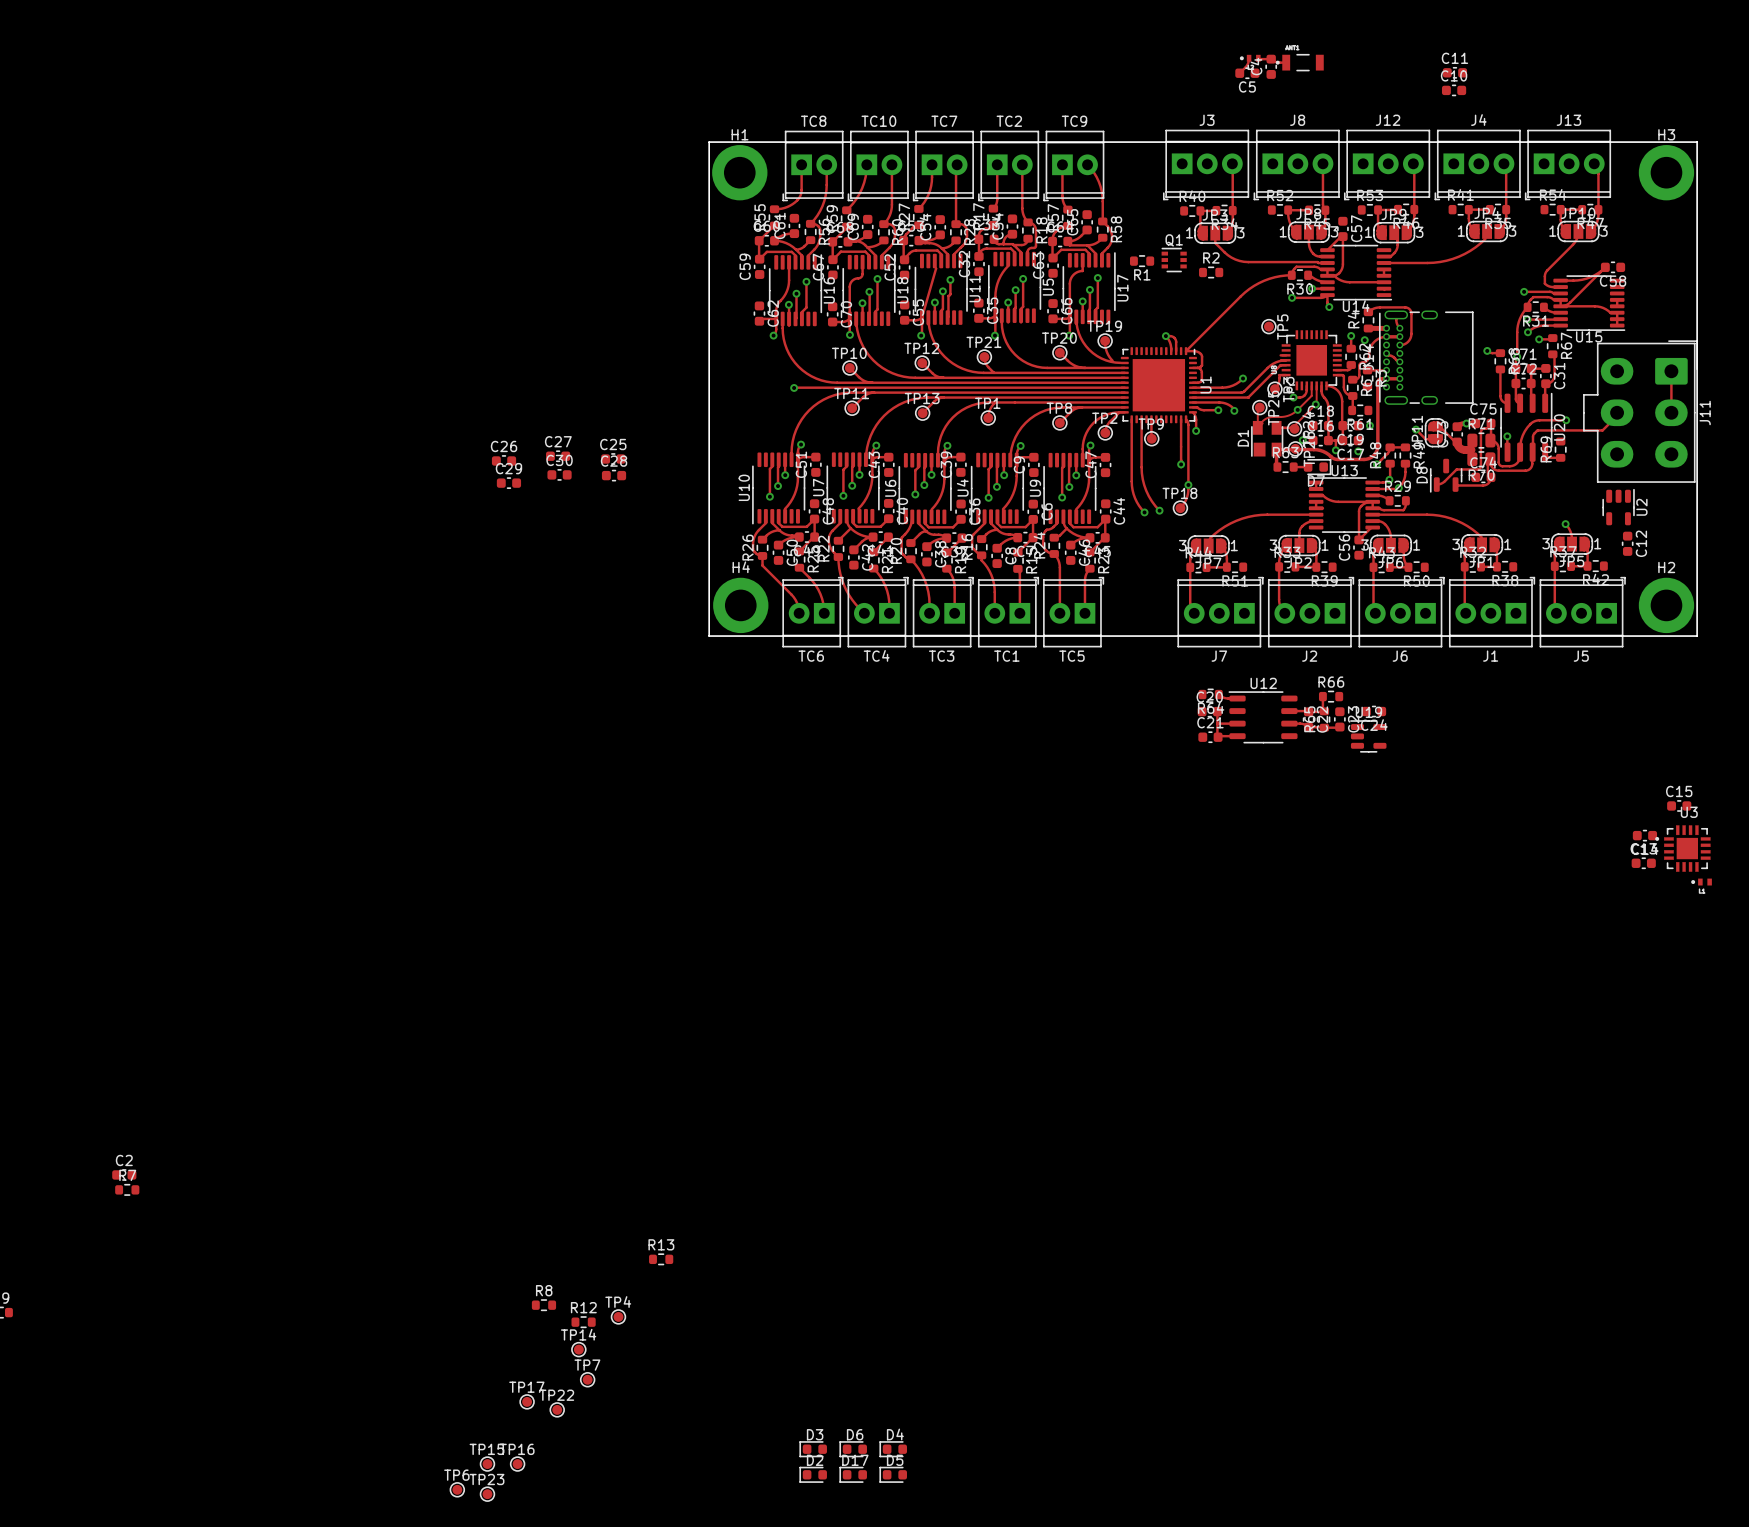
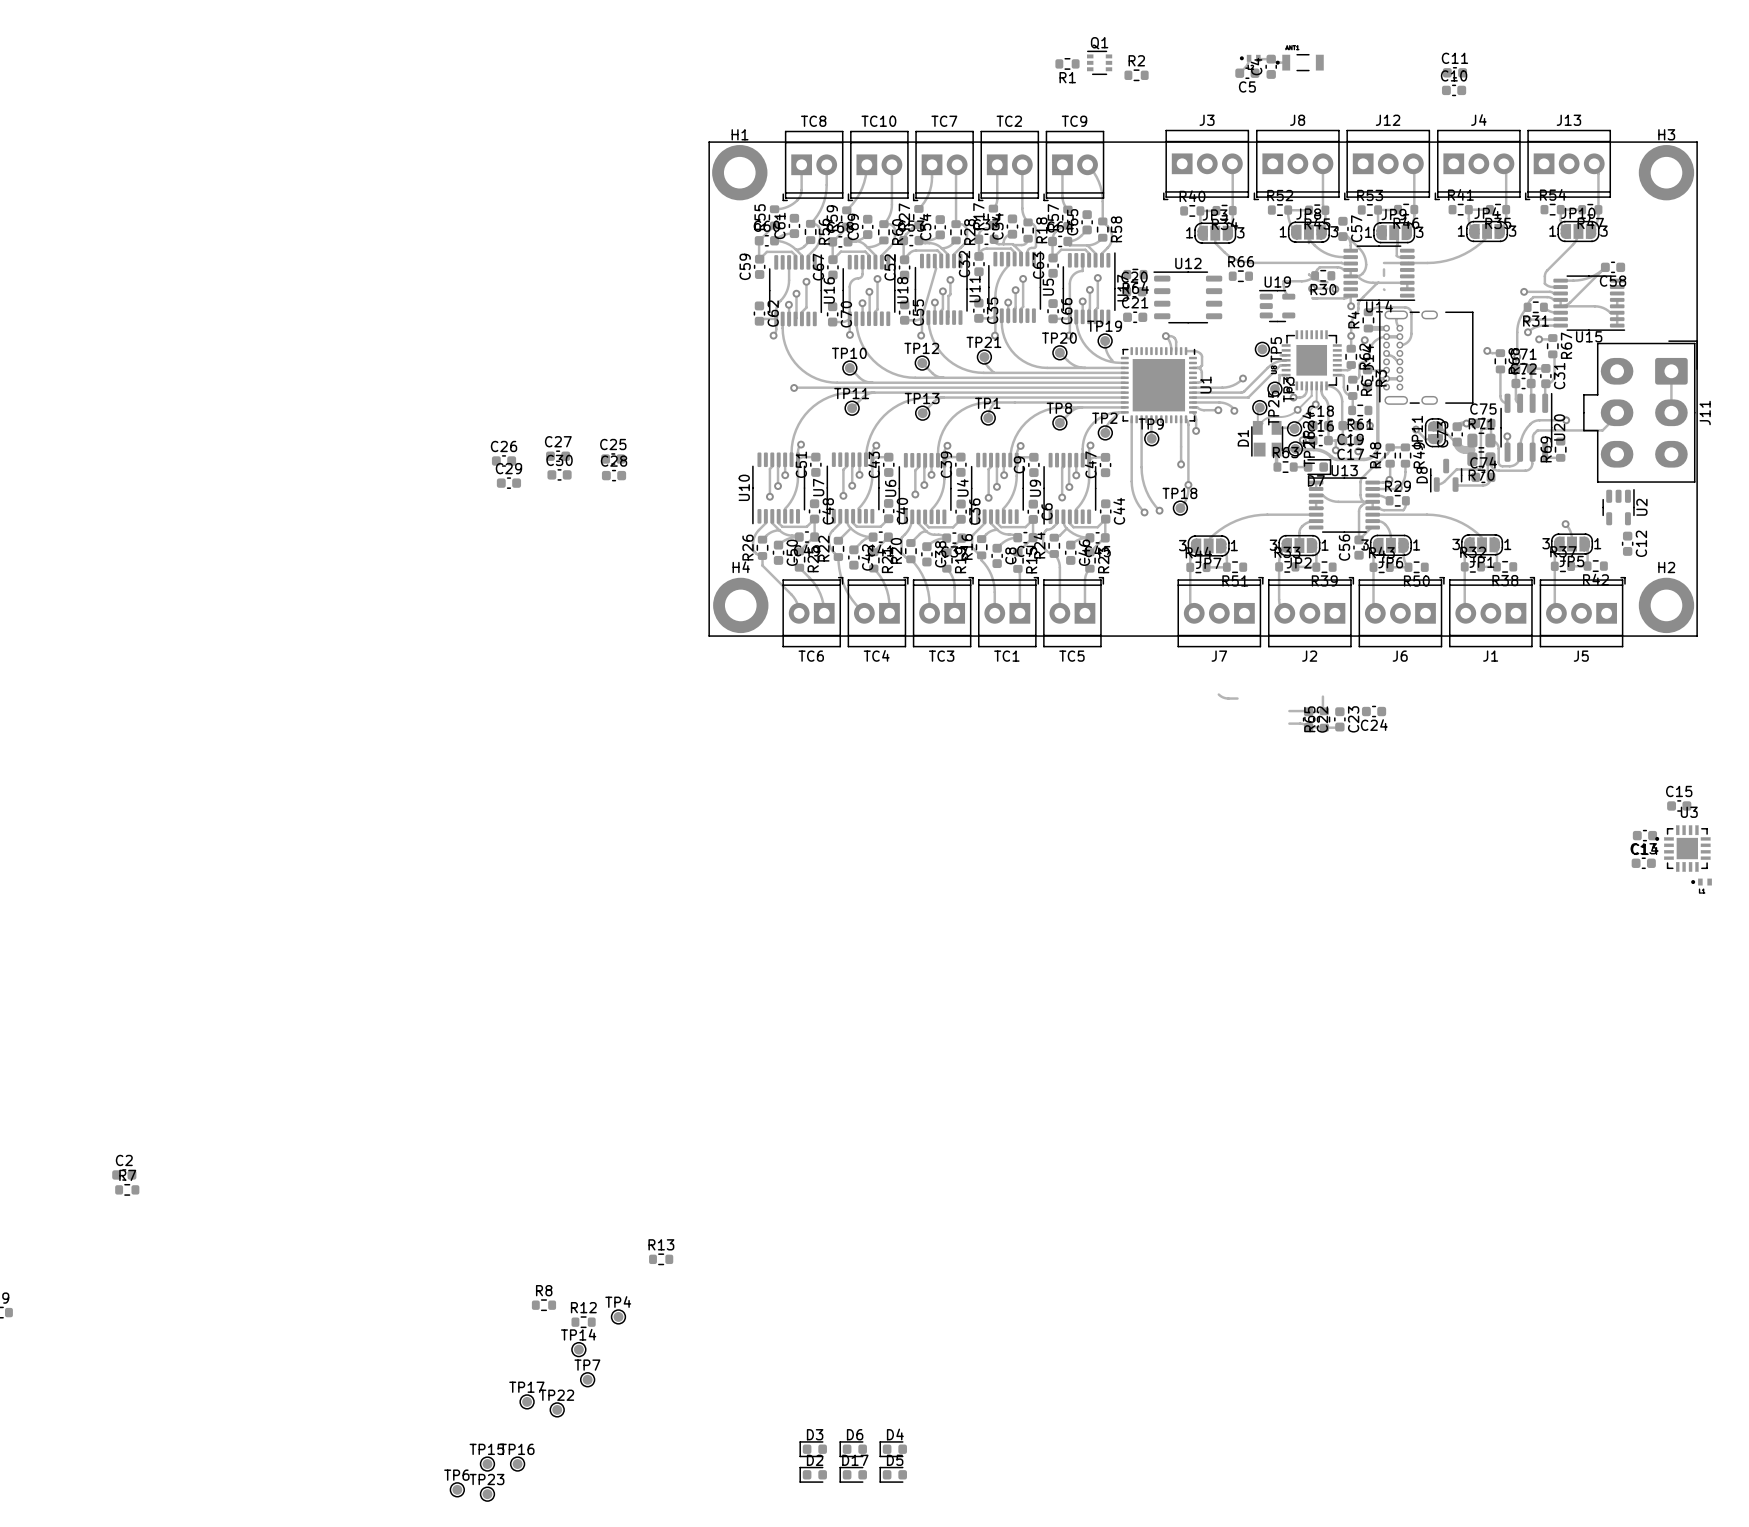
track: none -> (1308, 239) (1327, 254) (1350, 257)
track: (1308, 243) (1310, 250) (1314, 254) (1327, 256) -> none
track: (1397, 245) (1396, 250) (1390, 256) (1384, 256) -> (1397, 245) (1397, 256) (1414, 257)
track: (1327, 250) (1342, 236) (1342, 267) (1338, 273) (1332, 275) -> none
track: none -> (1350, 250) (1350, 241) (1346, 235) (1361, 250) (1365, 260) (1364, 271) (1356, 276)
Q1 position: (1174, 260) -> (1099, 62)
R1 position: (1142, 261) -> (1067, 63)
track: (1248, 262) (1326, 262) -> (1248, 262) (1342, 263)
track: (1327, 269) (1327, 275) (1334, 275) (1344, 281) (1384, 282) -> none
track: (1333, 269) (1296, 266) (1291, 275) (1274, 277) (1259, 283) (1240, 296) (1186, 351) -> none
track: none -> (1350, 269) (1350, 276) (1357, 276) (1367, 282) (1407, 282) (1408, 289)
track: none -> (1356, 269) (1319, 267) (1315, 275) (1309, 279) (1283, 281) (1284, 289) (1288, 296)
R2 position: (1211, 272) -> (1136, 75)
U14 position: (1356, 272) -> (1379, 273)
R30 position: (1299, 275) -> (1323, 275)
track: none -> (1378, 282) (1359, 301) (1357, 311) (1351, 321) (1351, 335)
via: none -> (1335, 289)
track: (1292, 297) (1321, 297) (1327, 295) (1329, 307) -> none
via: (1292, 297) -> none
track: none -> (1312, 298) (1344, 298) (1350, 295) (1350, 303)
via: none -> (1351, 306)
via: (1329, 307) -> none
TP5 position: (1268, 326) -> (1262, 349)
track: none -> (1376, 464) (1361, 479) (1360, 495) (1363, 501)
R64 position: (1210, 694) -> (1135, 274)
R66 position: (1331, 696) -> (1240, 276)
C20 position: (1209, 711) -> (1134, 291)
track: (1217, 711) (1217, 737) (1237, 736) -> none
U12 position: (1263, 717) -> (1187, 297)
track: (1217, 723) (1237, 723) -> none
U19 position: (1368, 736) -> (1277, 306)
C21 position: (1210, 737) -> (1135, 317)

